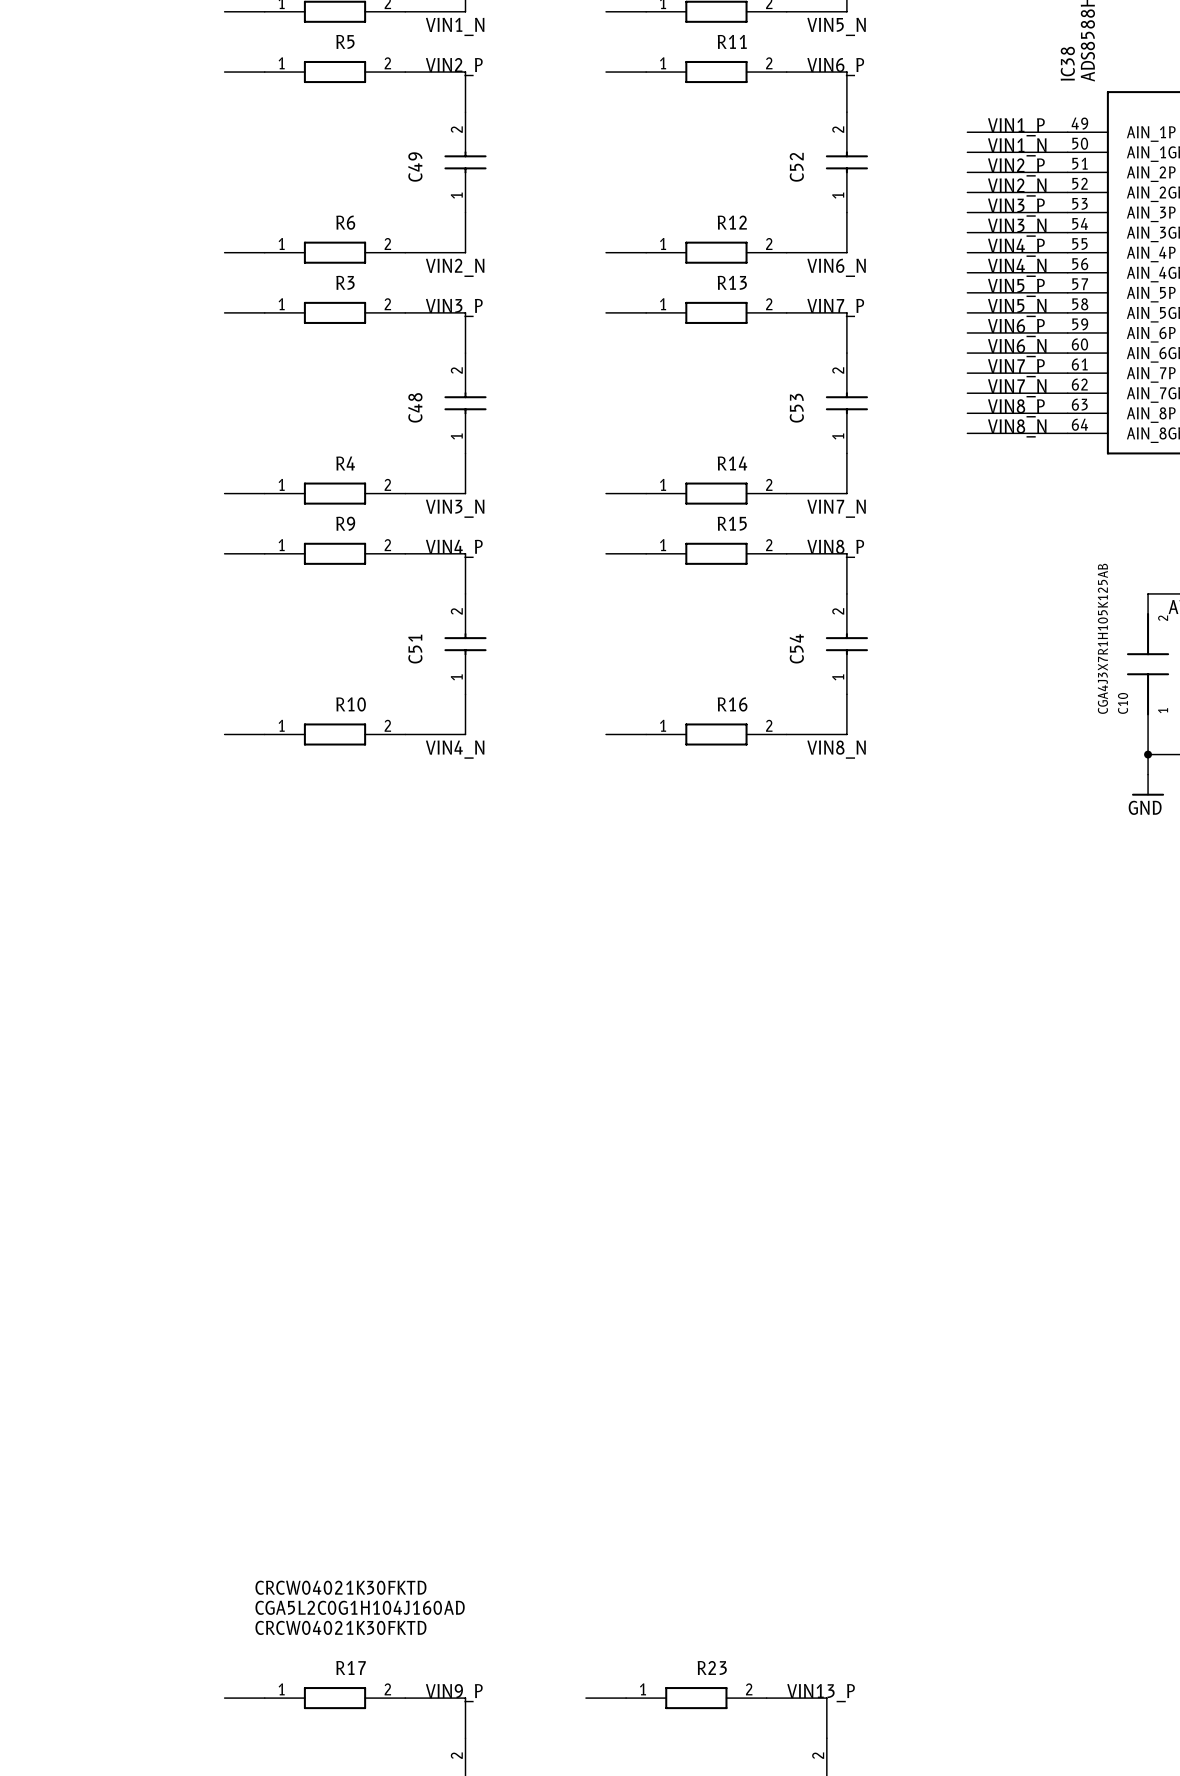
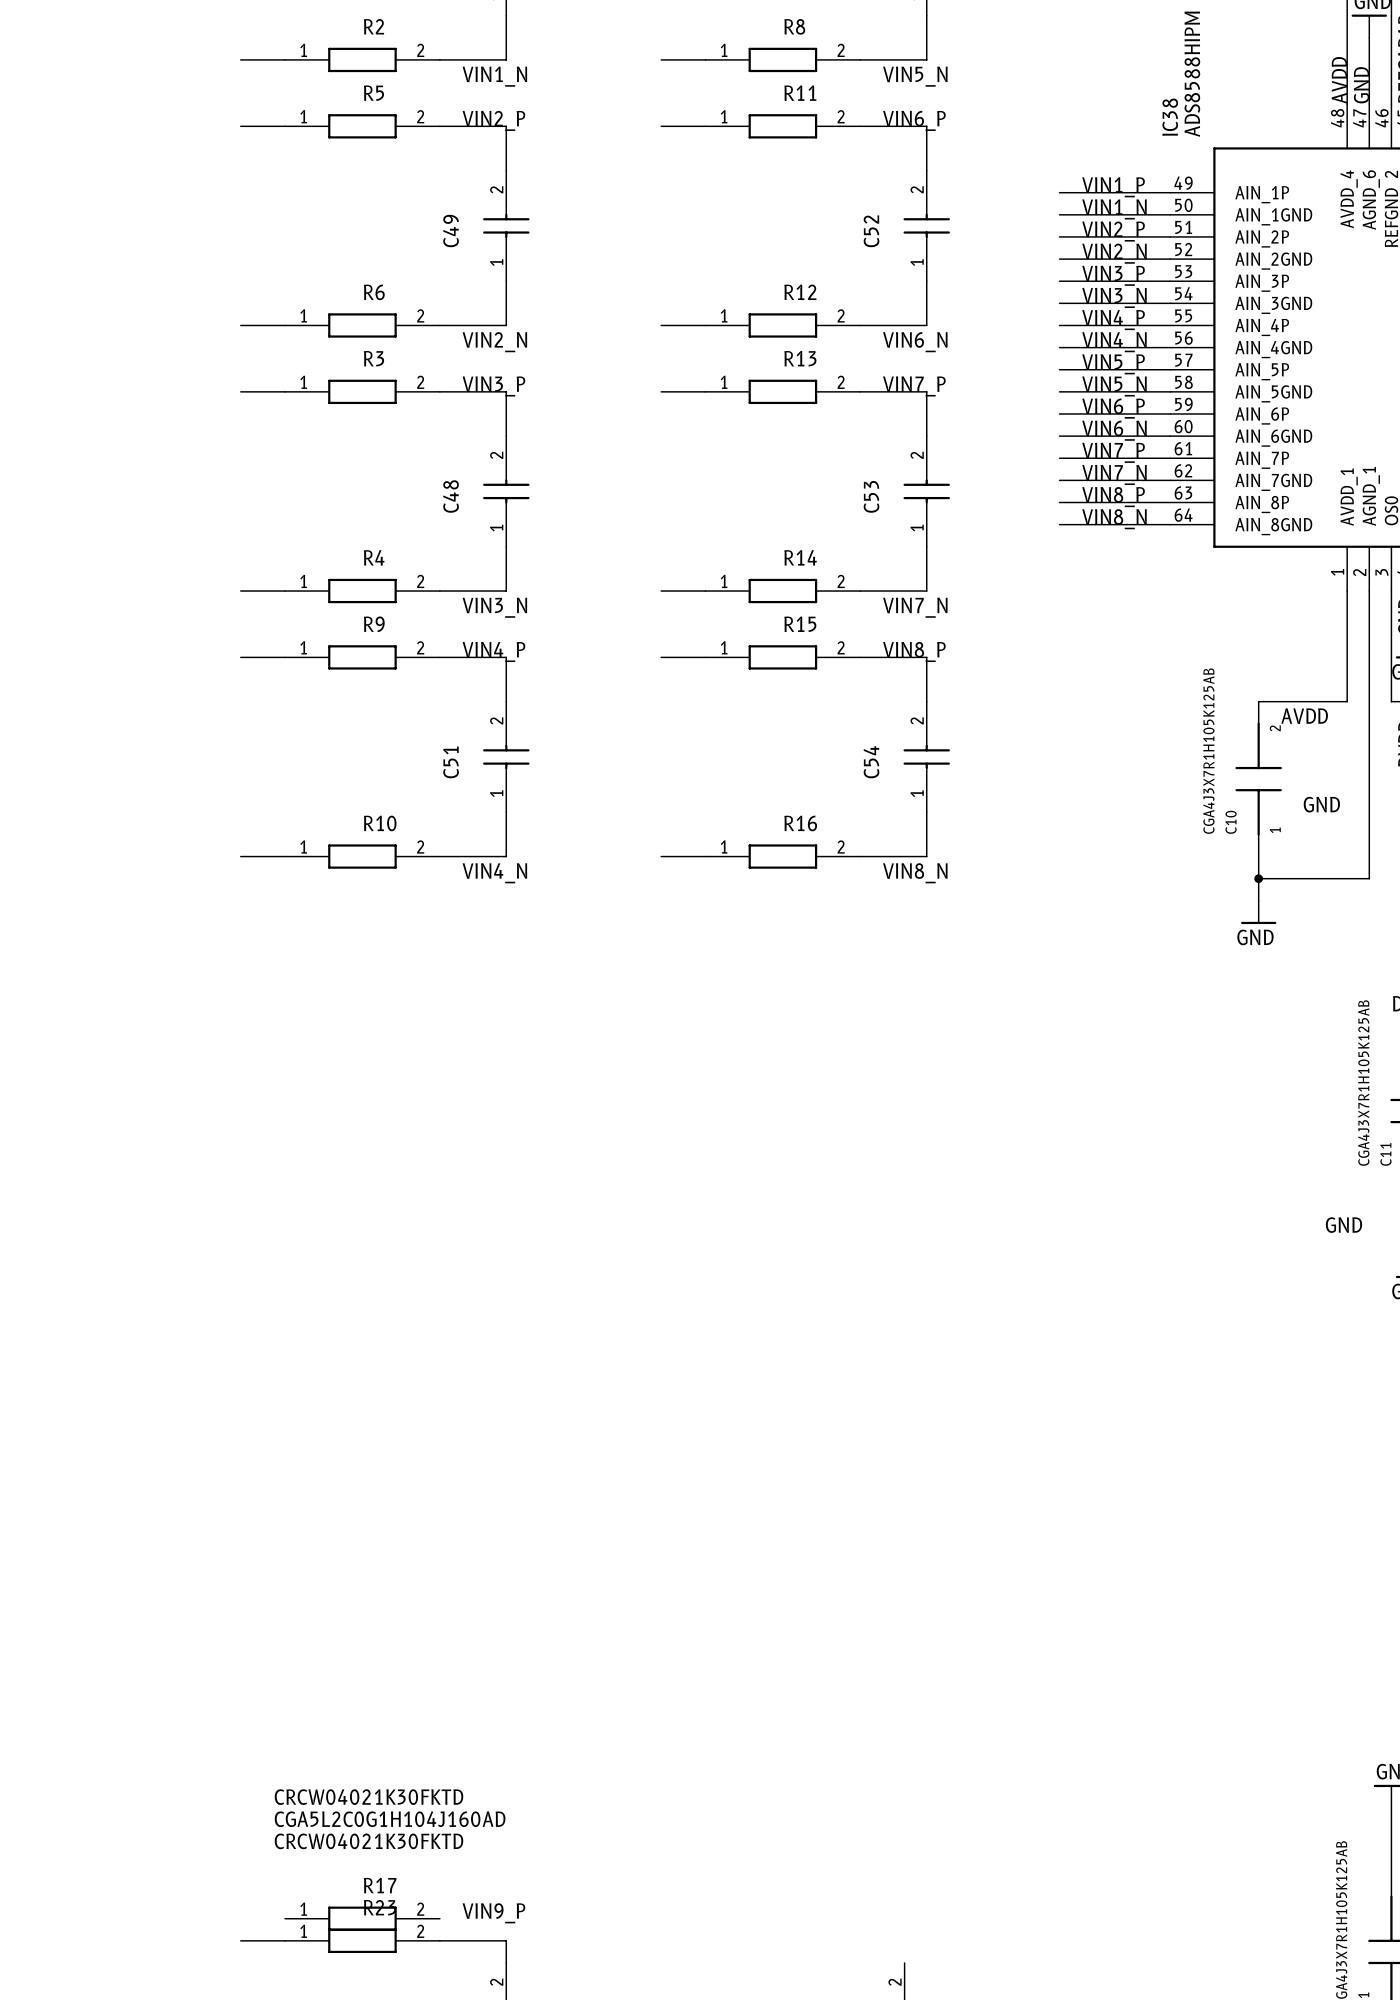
label: VIN13_P (821, 1693) -> none
wire: (224, 1698) (264, 1698) -> (240, 1940) (285, 1940)
wire: (405, 1698) (465, 1698) (465, 1718) -> (439, 1940) (506, 1940)
wire: (585, 1698) (626, 1698) -> none
R23 position: (696, 1698) -> (362, 1940)
wire: (766, 1698) (826, 1698) (826, 1738) -> none

